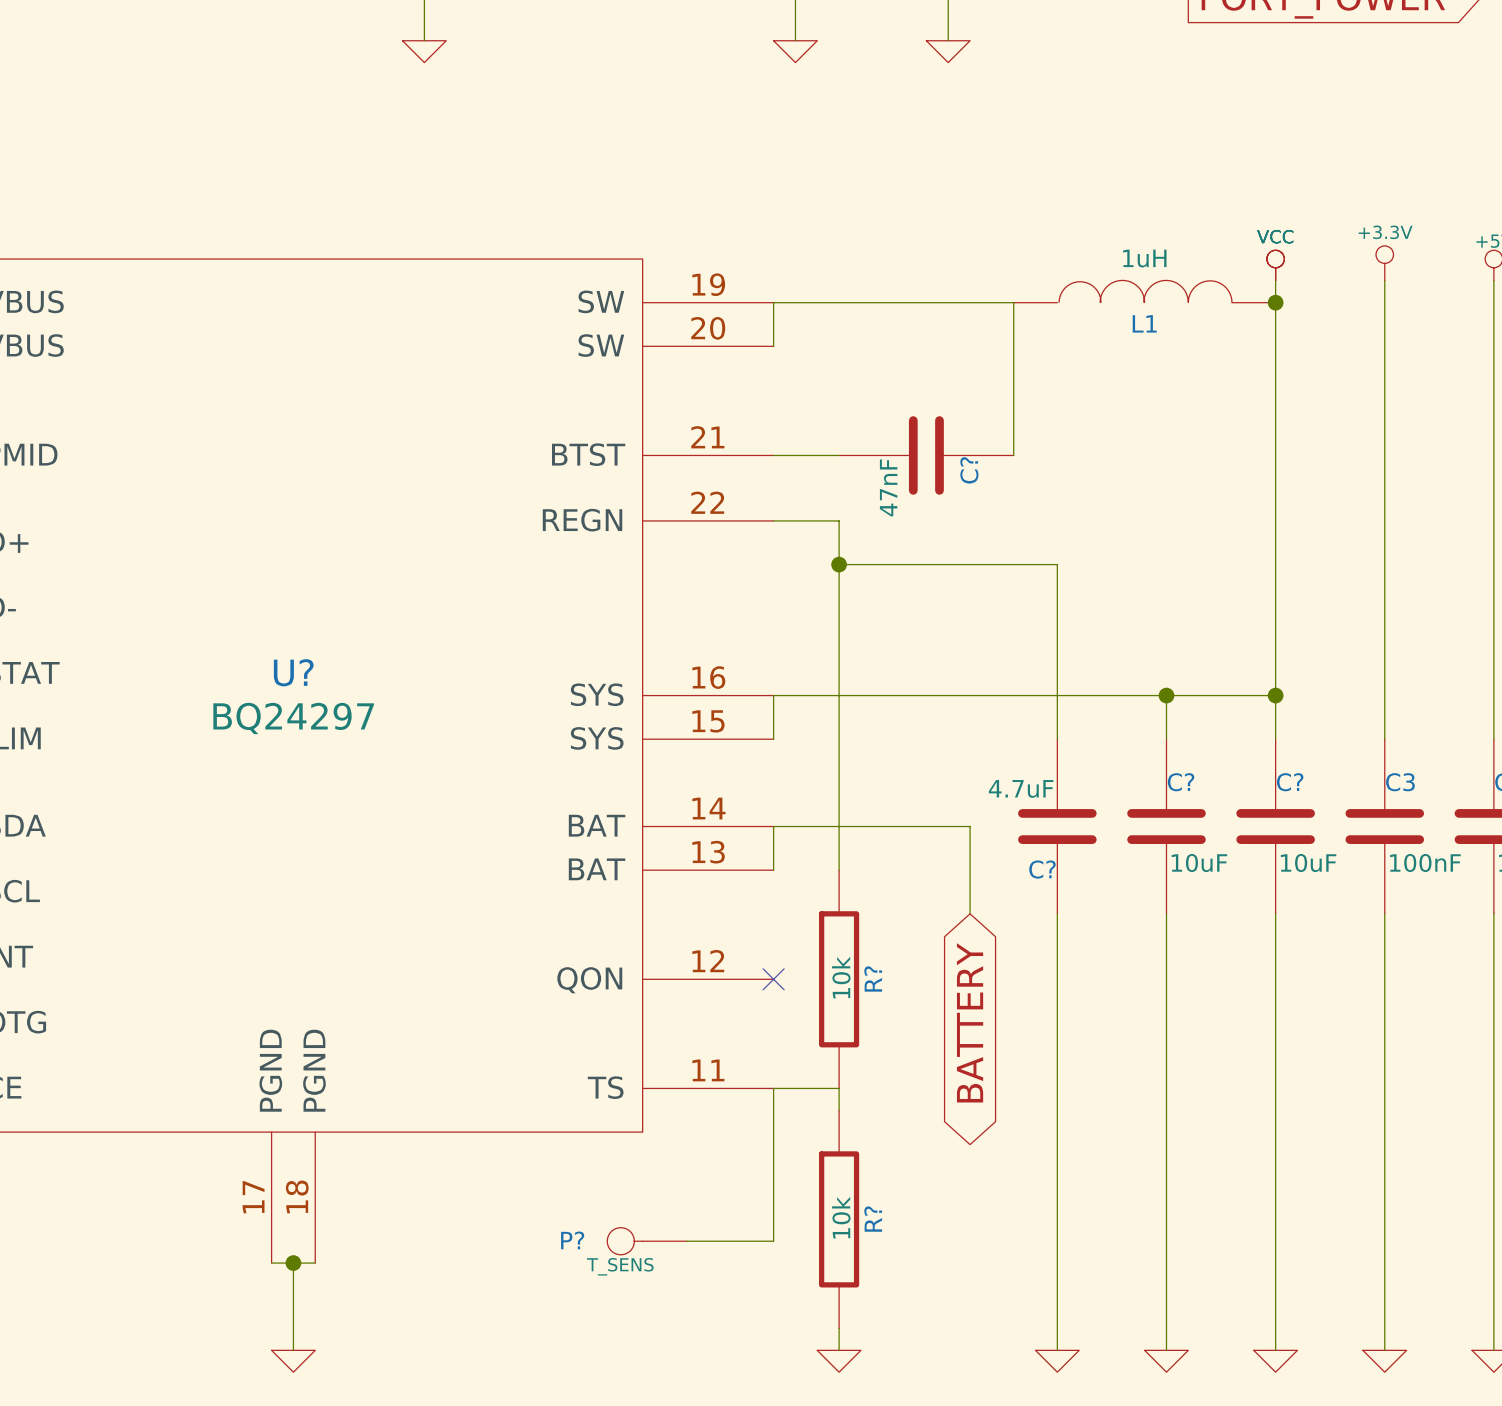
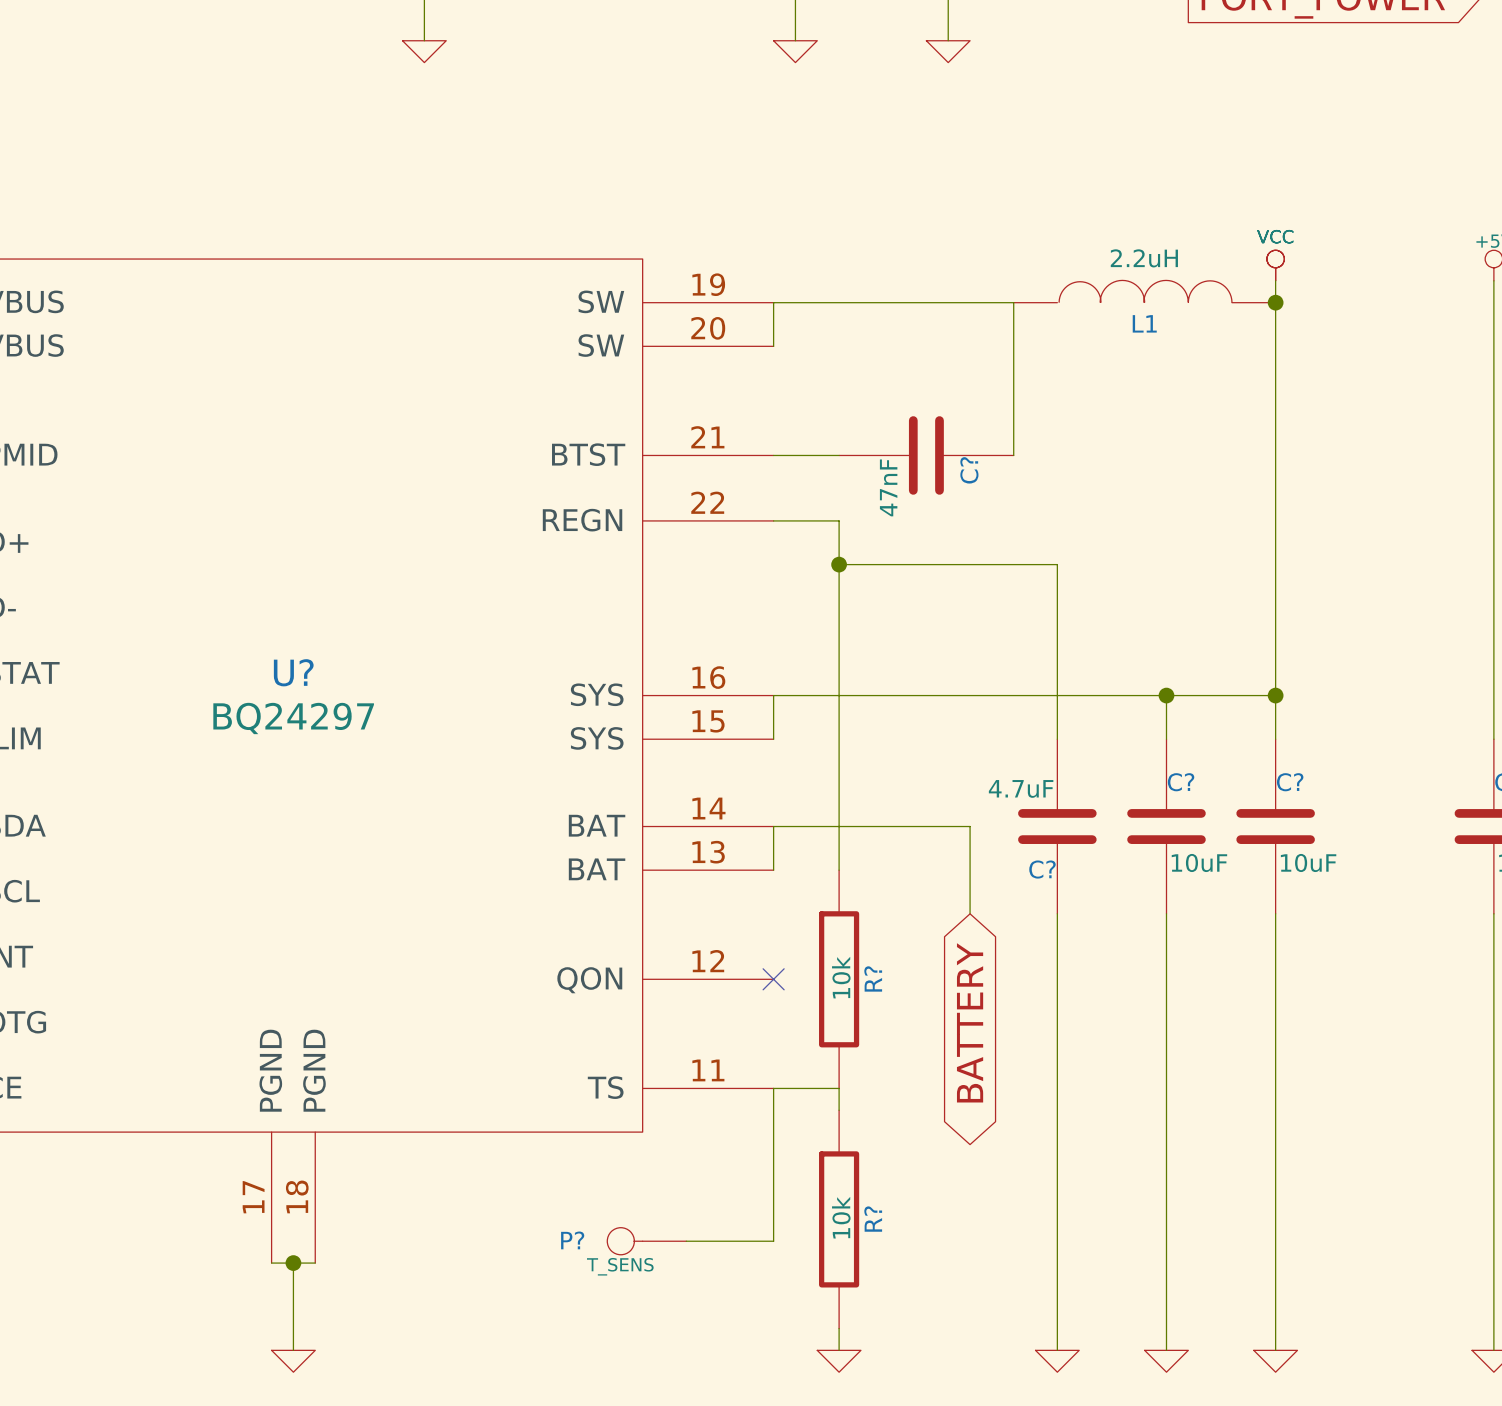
L1 value: 1uH (1144, 258) -> 2.2uH (1144, 258)
power symbol: +3.3V (1384, 263) -> none
wire: (1384, 280) (1384, 739) -> none
C3: 100nF (1384, 826) -> none
wire: (1384, 913) (1384, 1350) -> none
power symbol: (1384, 1361) -> none

